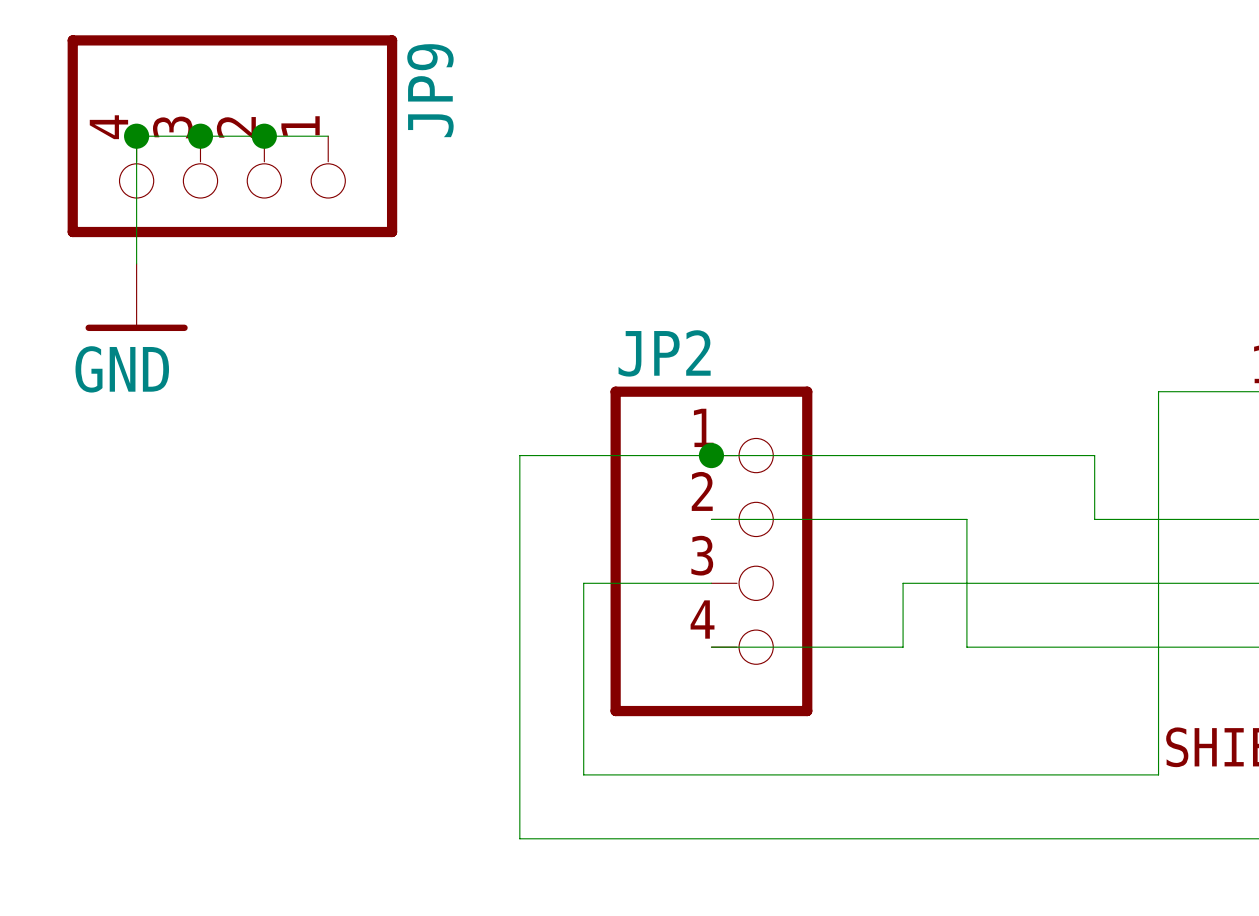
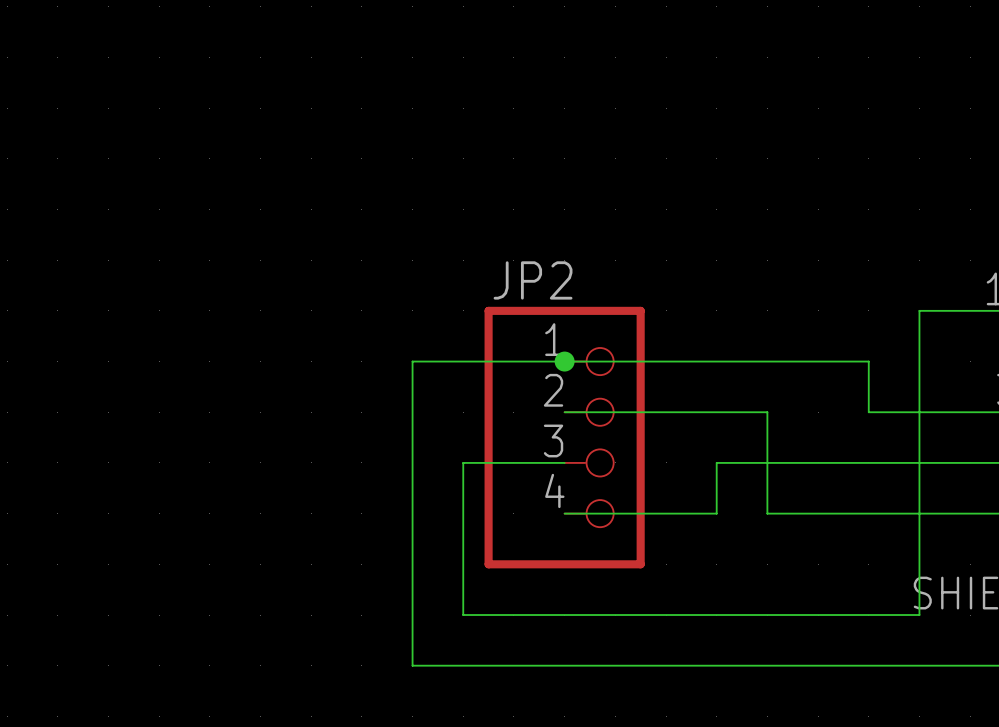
junction: (136, 136) -> none
junction: (200, 136) -> none
JP9: (232, 136) -> none
junction: (264, 136) -> none
wire: (328, 136) (136, 136) (136, 263) -> none
power symbol: GND (136, 297) -> none

